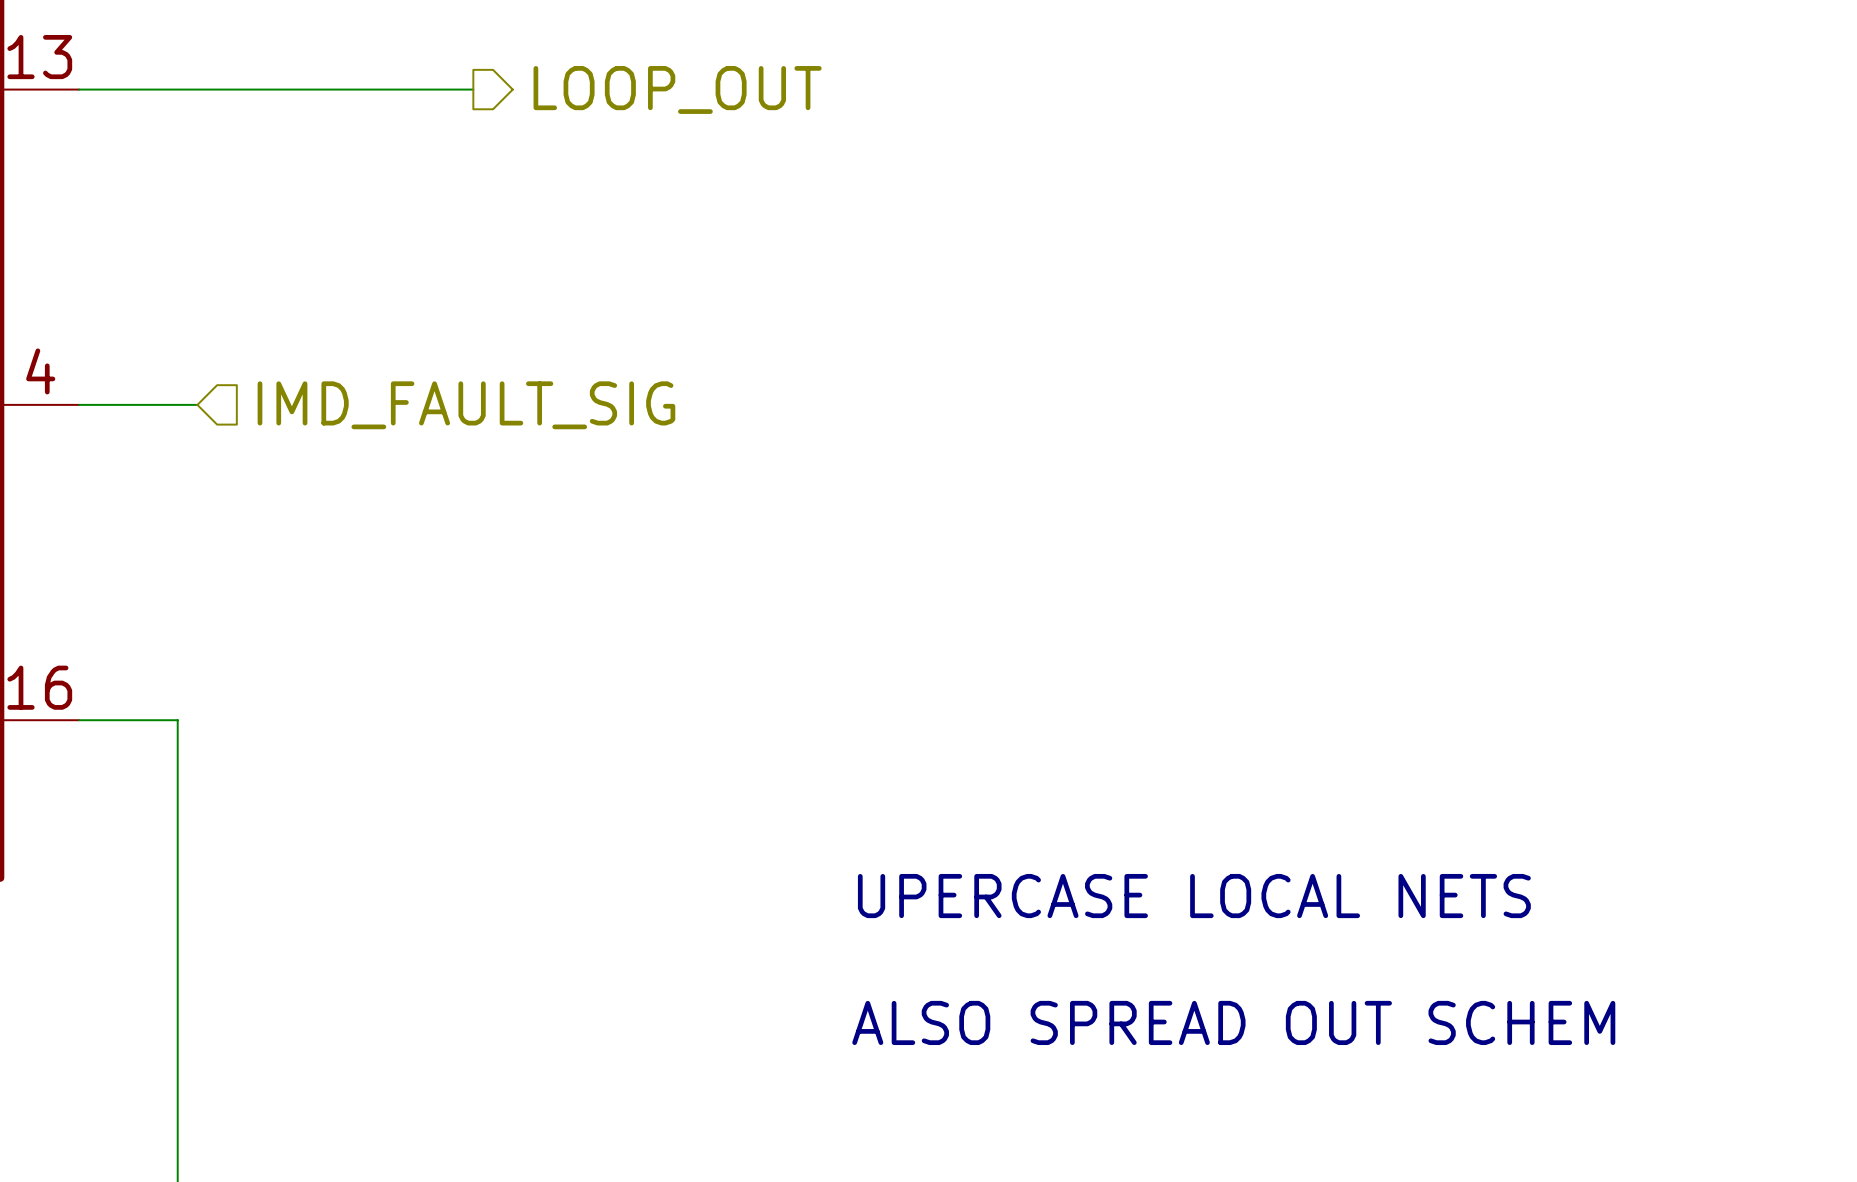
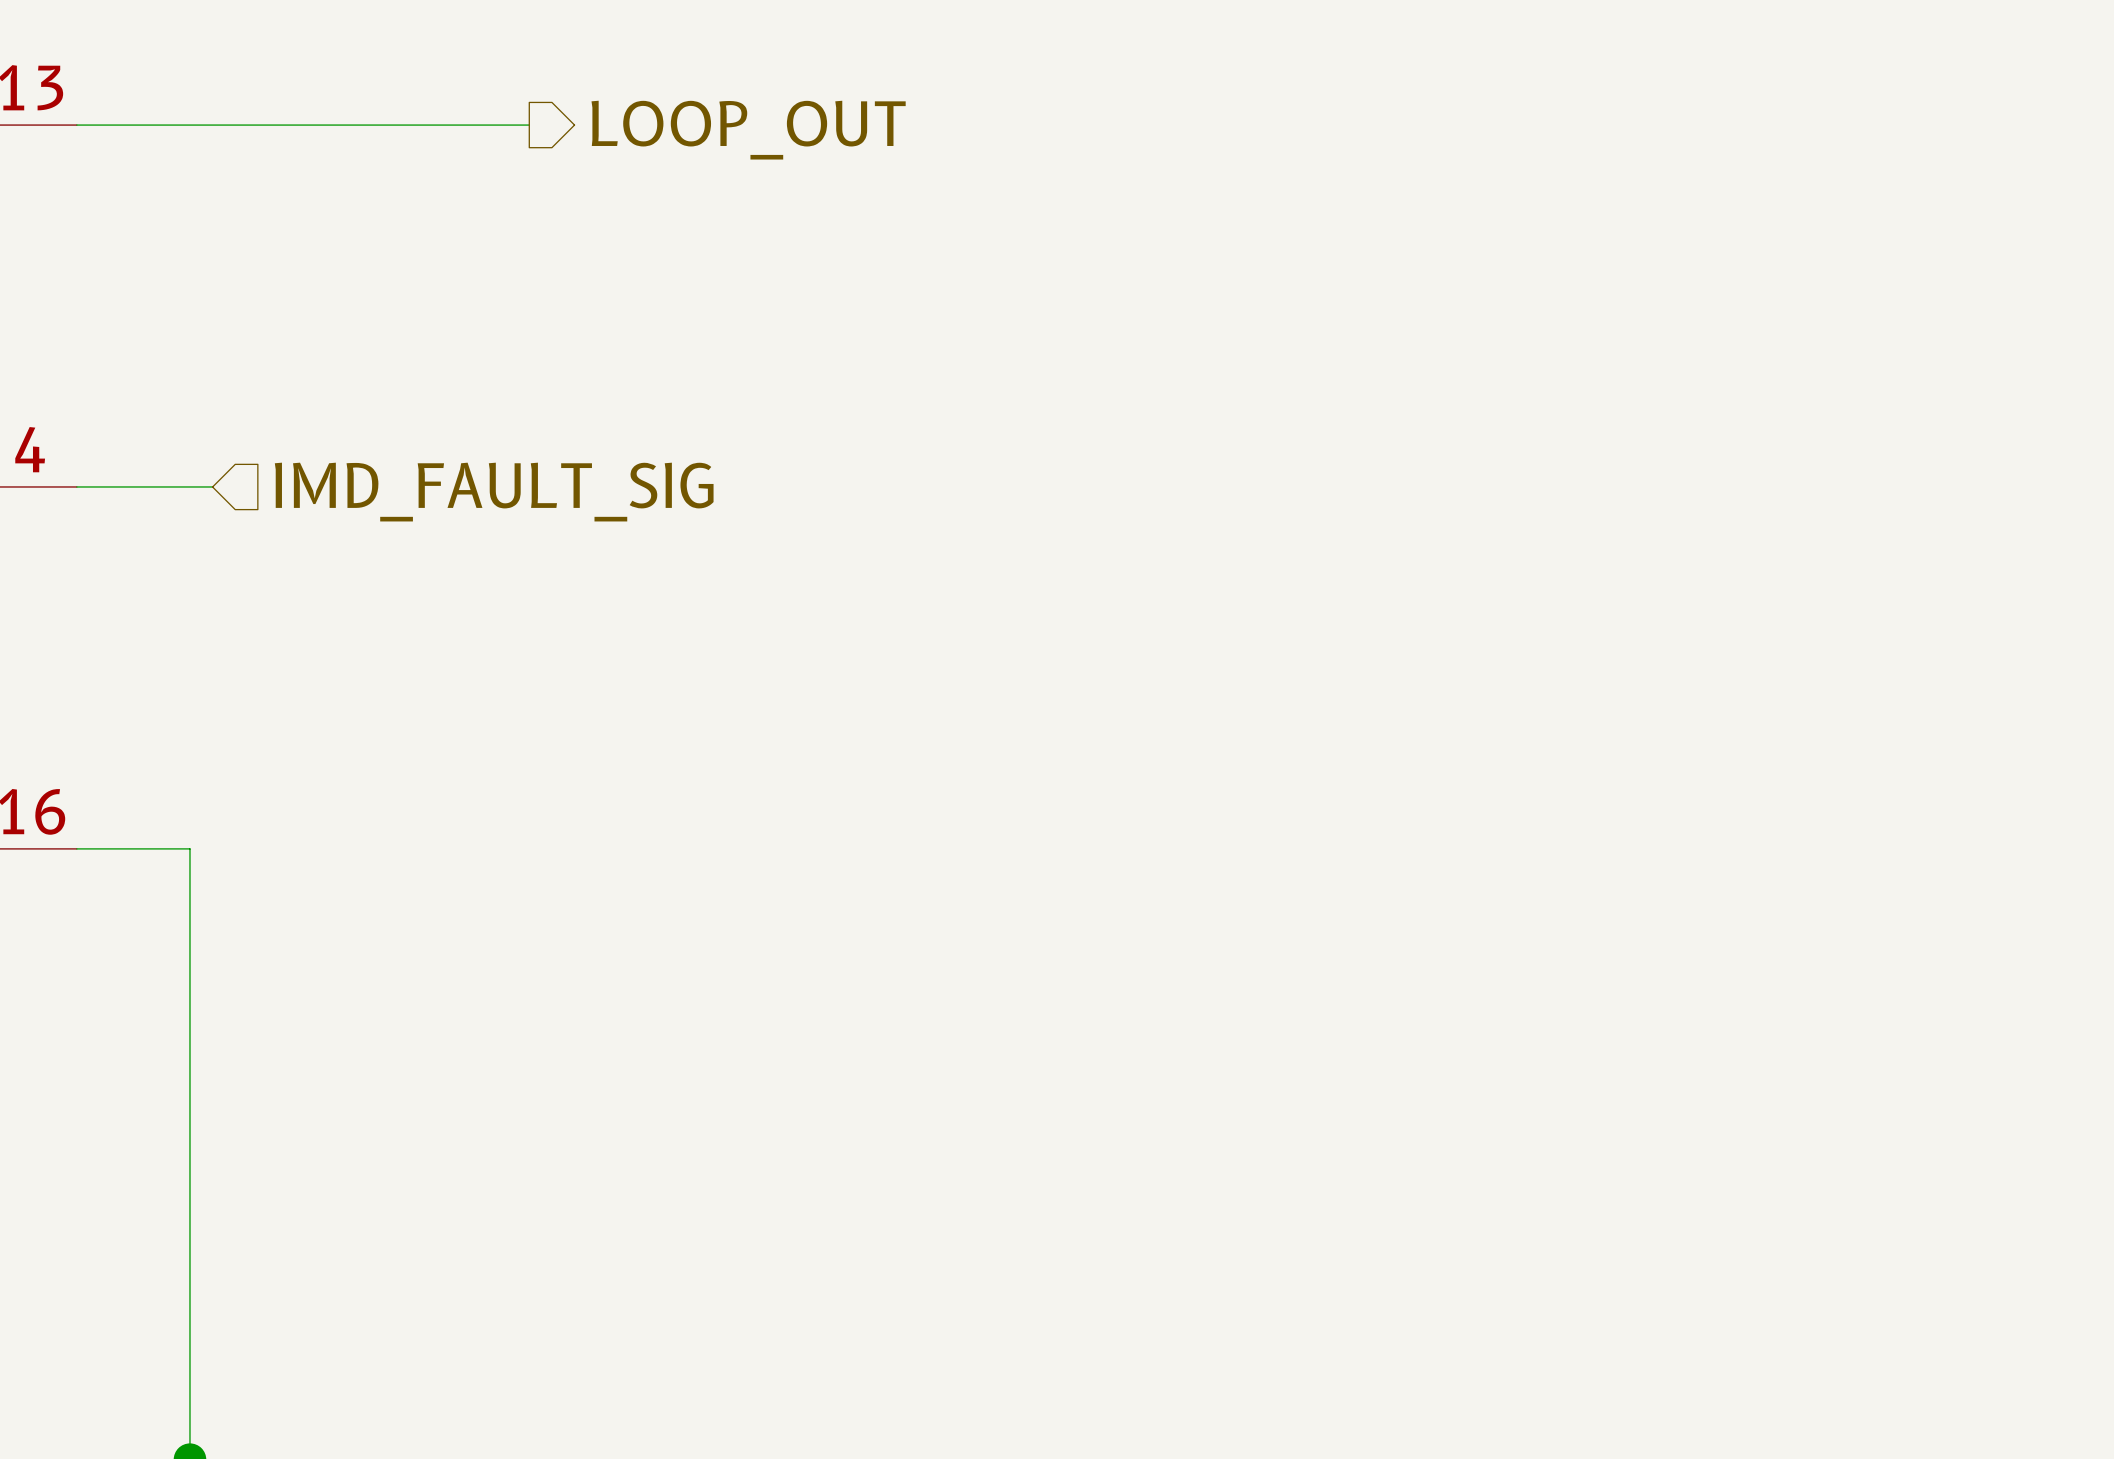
text: UPERCASE LOCAL NETS (1194, 896) -> none
text: ALSO SPREAD OUT SCHEM (1233, 1022) -> none

